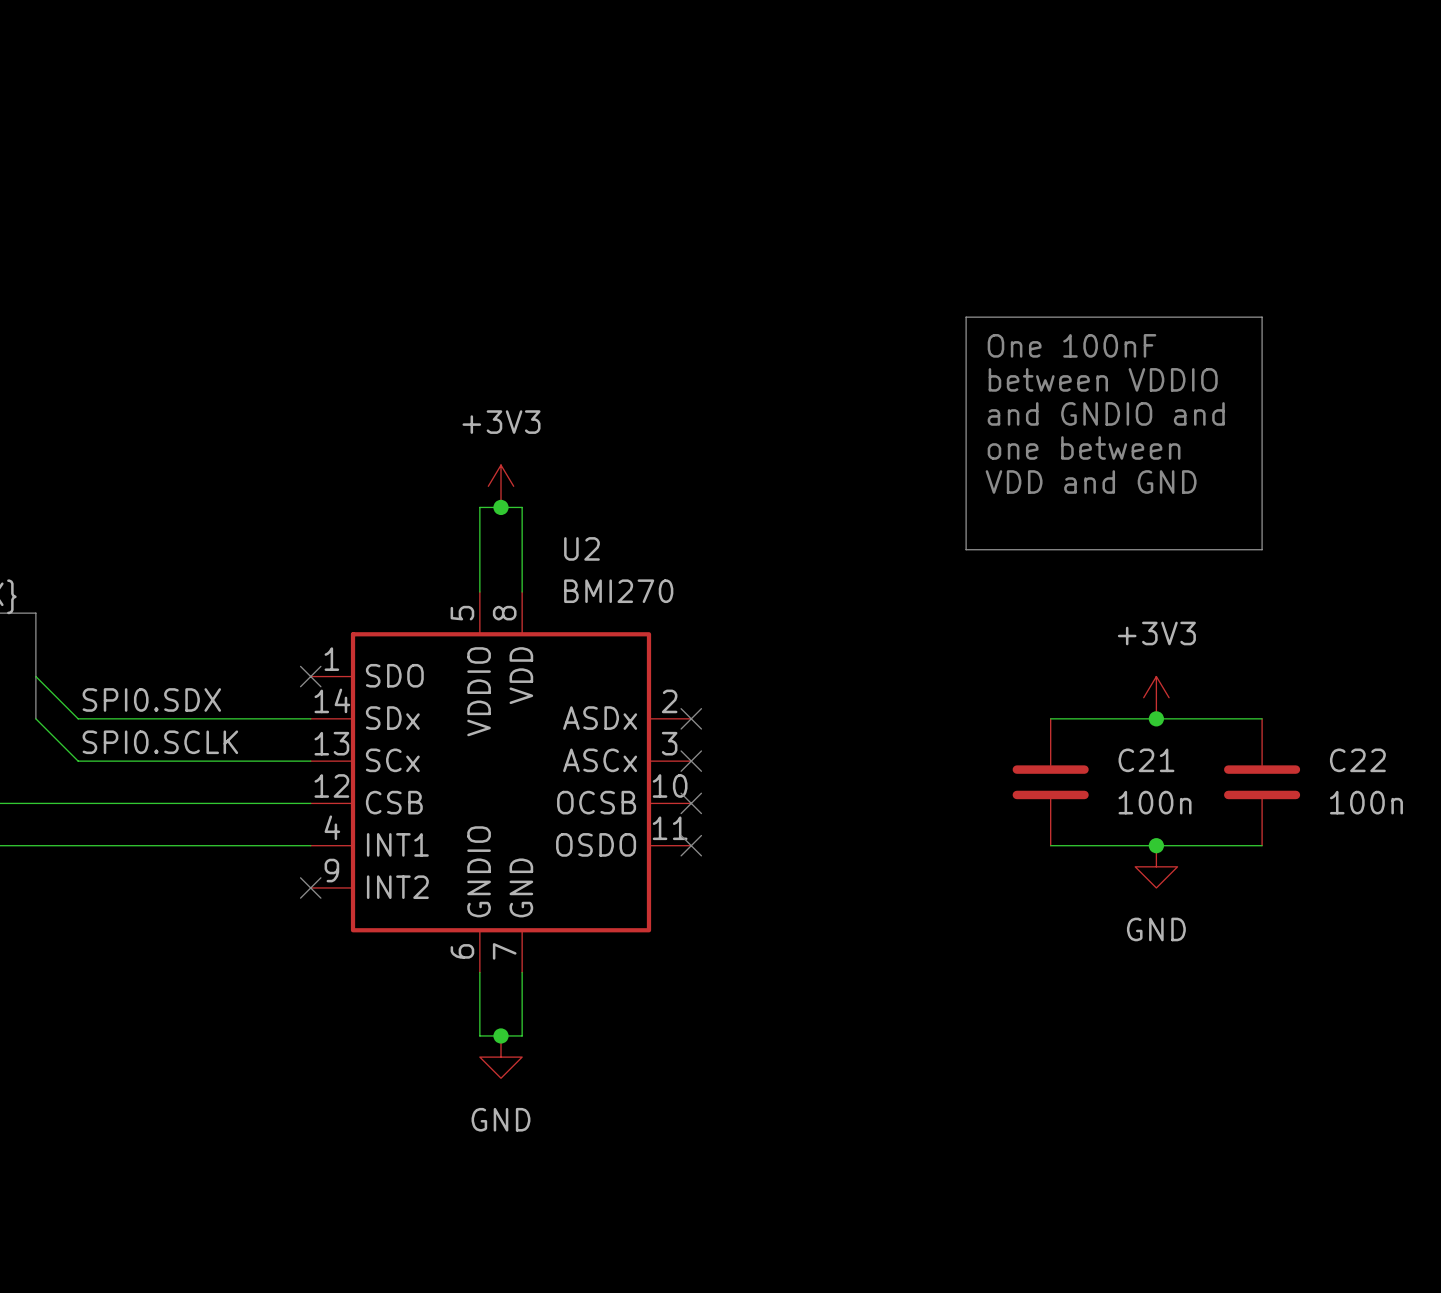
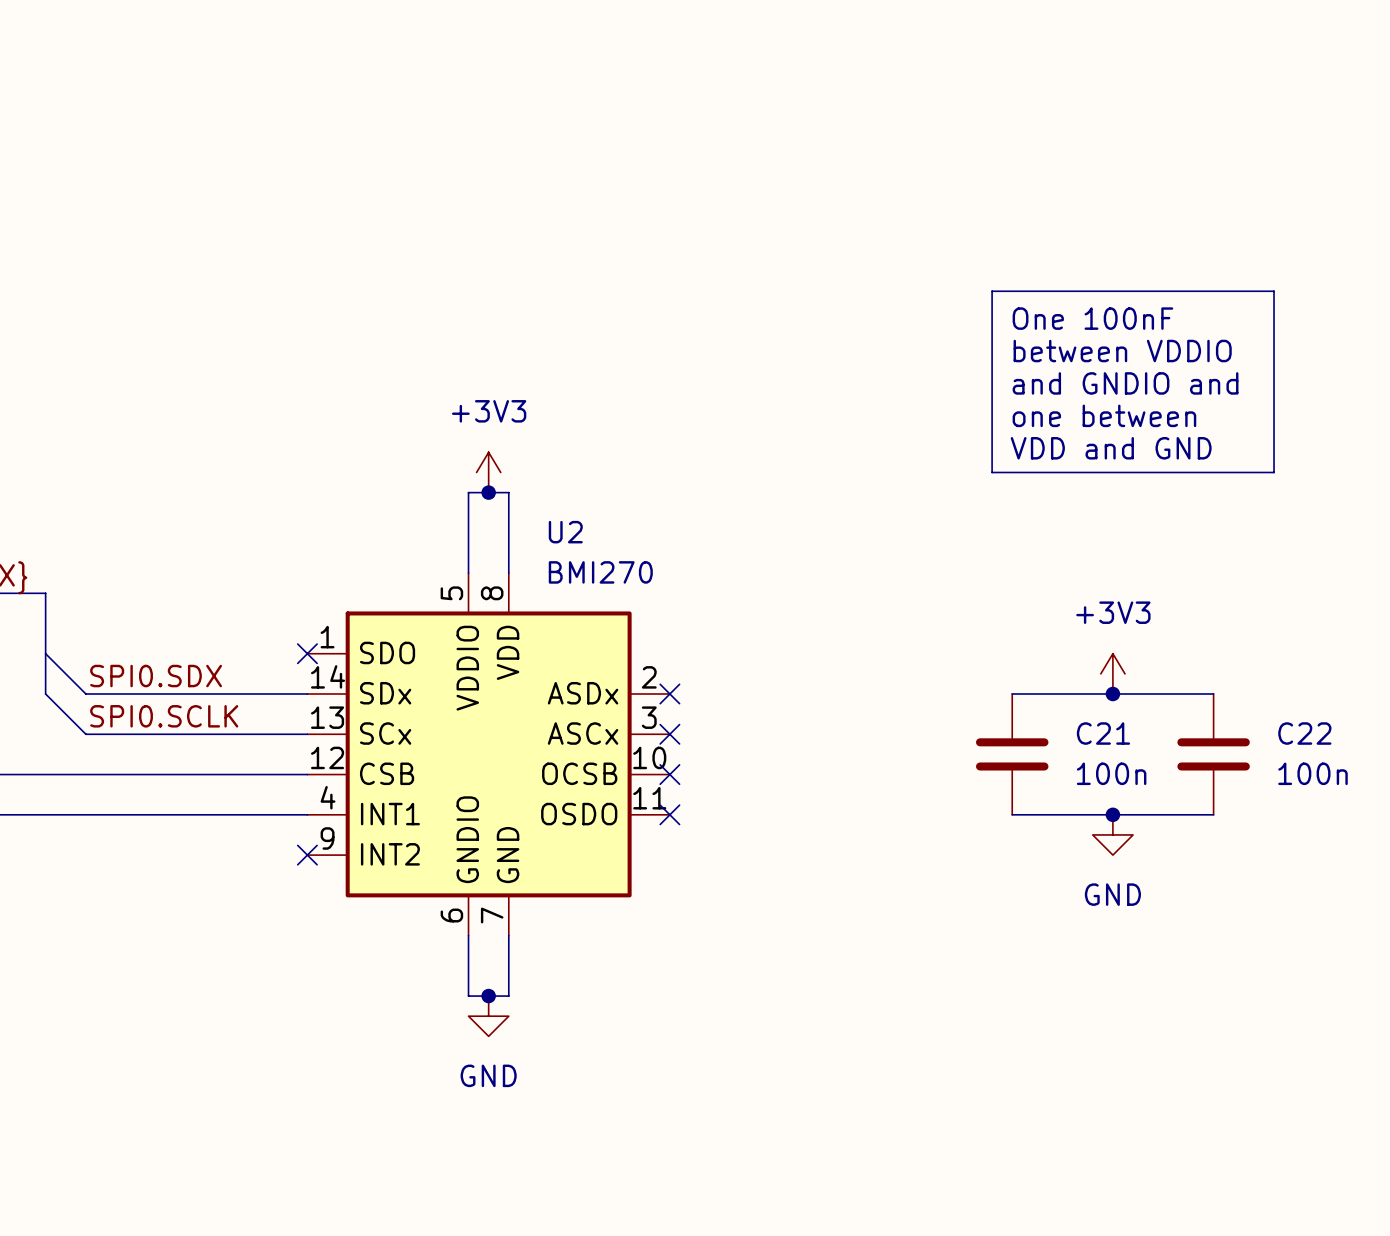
line: none -> (992, 291) (1274, 291) (1274, 472) (992, 472) (992, 291)
line: (966, 317) (1262, 317) (1262, 549) (966, 549) (966, 317) -> none
text position: One 100nF (1071, 345) -> One 100nF (1092, 318)
text position: between VDDIO (1103, 379) -> between VDDIO (1122, 351)
text position: and GNDIO and (1106, 413) -> and GNDIO and (1125, 383)
text position: one between (1084, 447) -> one between (1104, 415)
text position: VDD and GND (1091, 482) -> VDD and GND (1111, 448)

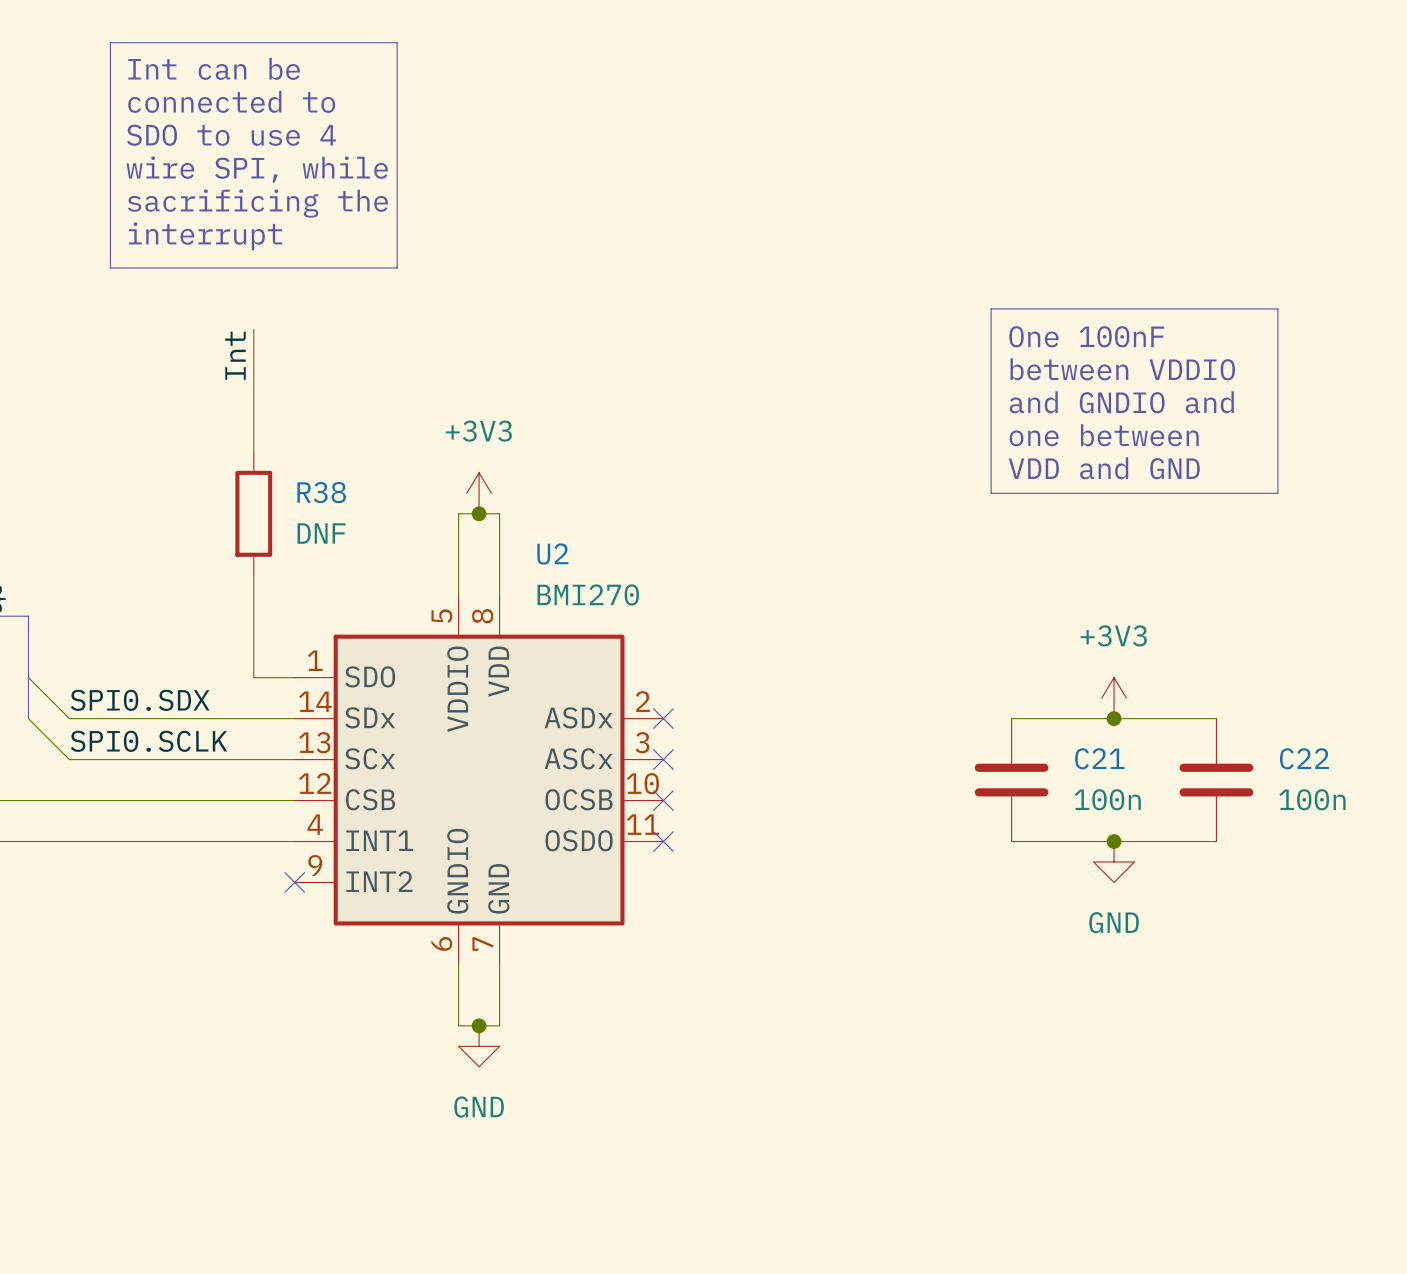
line: none -> (110, 42) (397, 42) (397, 268) (110, 268) (110, 42)
text: none -> Int can be (214, 68)
text: none -> connected to (231, 101)
text: none -> SDO to use 4 (231, 135)
text: none -> wire SPI, while (257, 169)
text: none -> sacrificing the (257, 203)
text: none -> interrupt (205, 236)
wire: none -> (253, 329) (253, 452)
label: none -> Int (235, 355)
R38: none -> DNF (253, 513)
wire: none -> (253, 575) (253, 677) (294, 677)
no-connect mark: (307, 653) -> none

